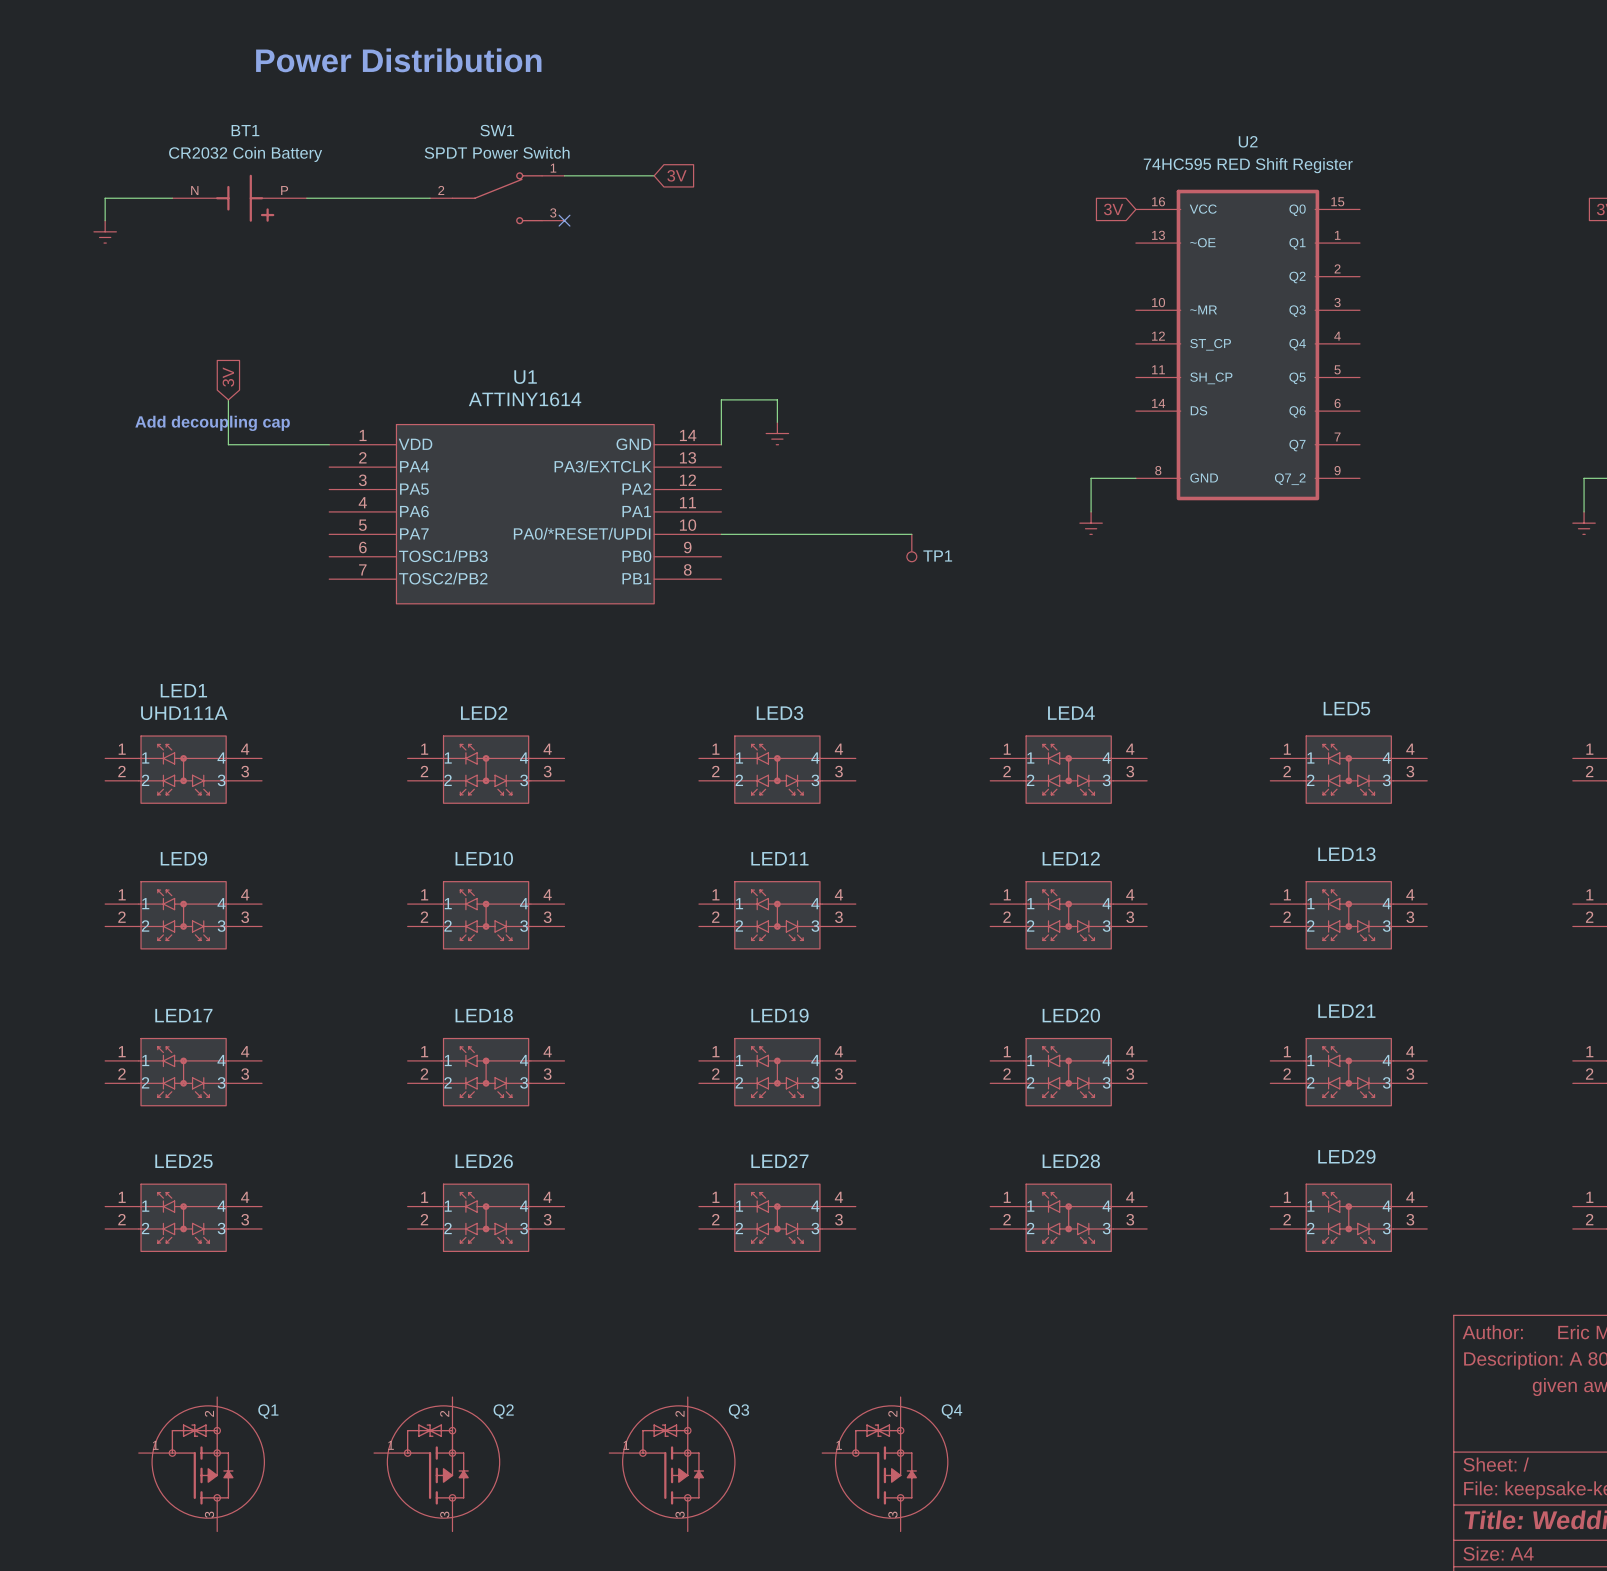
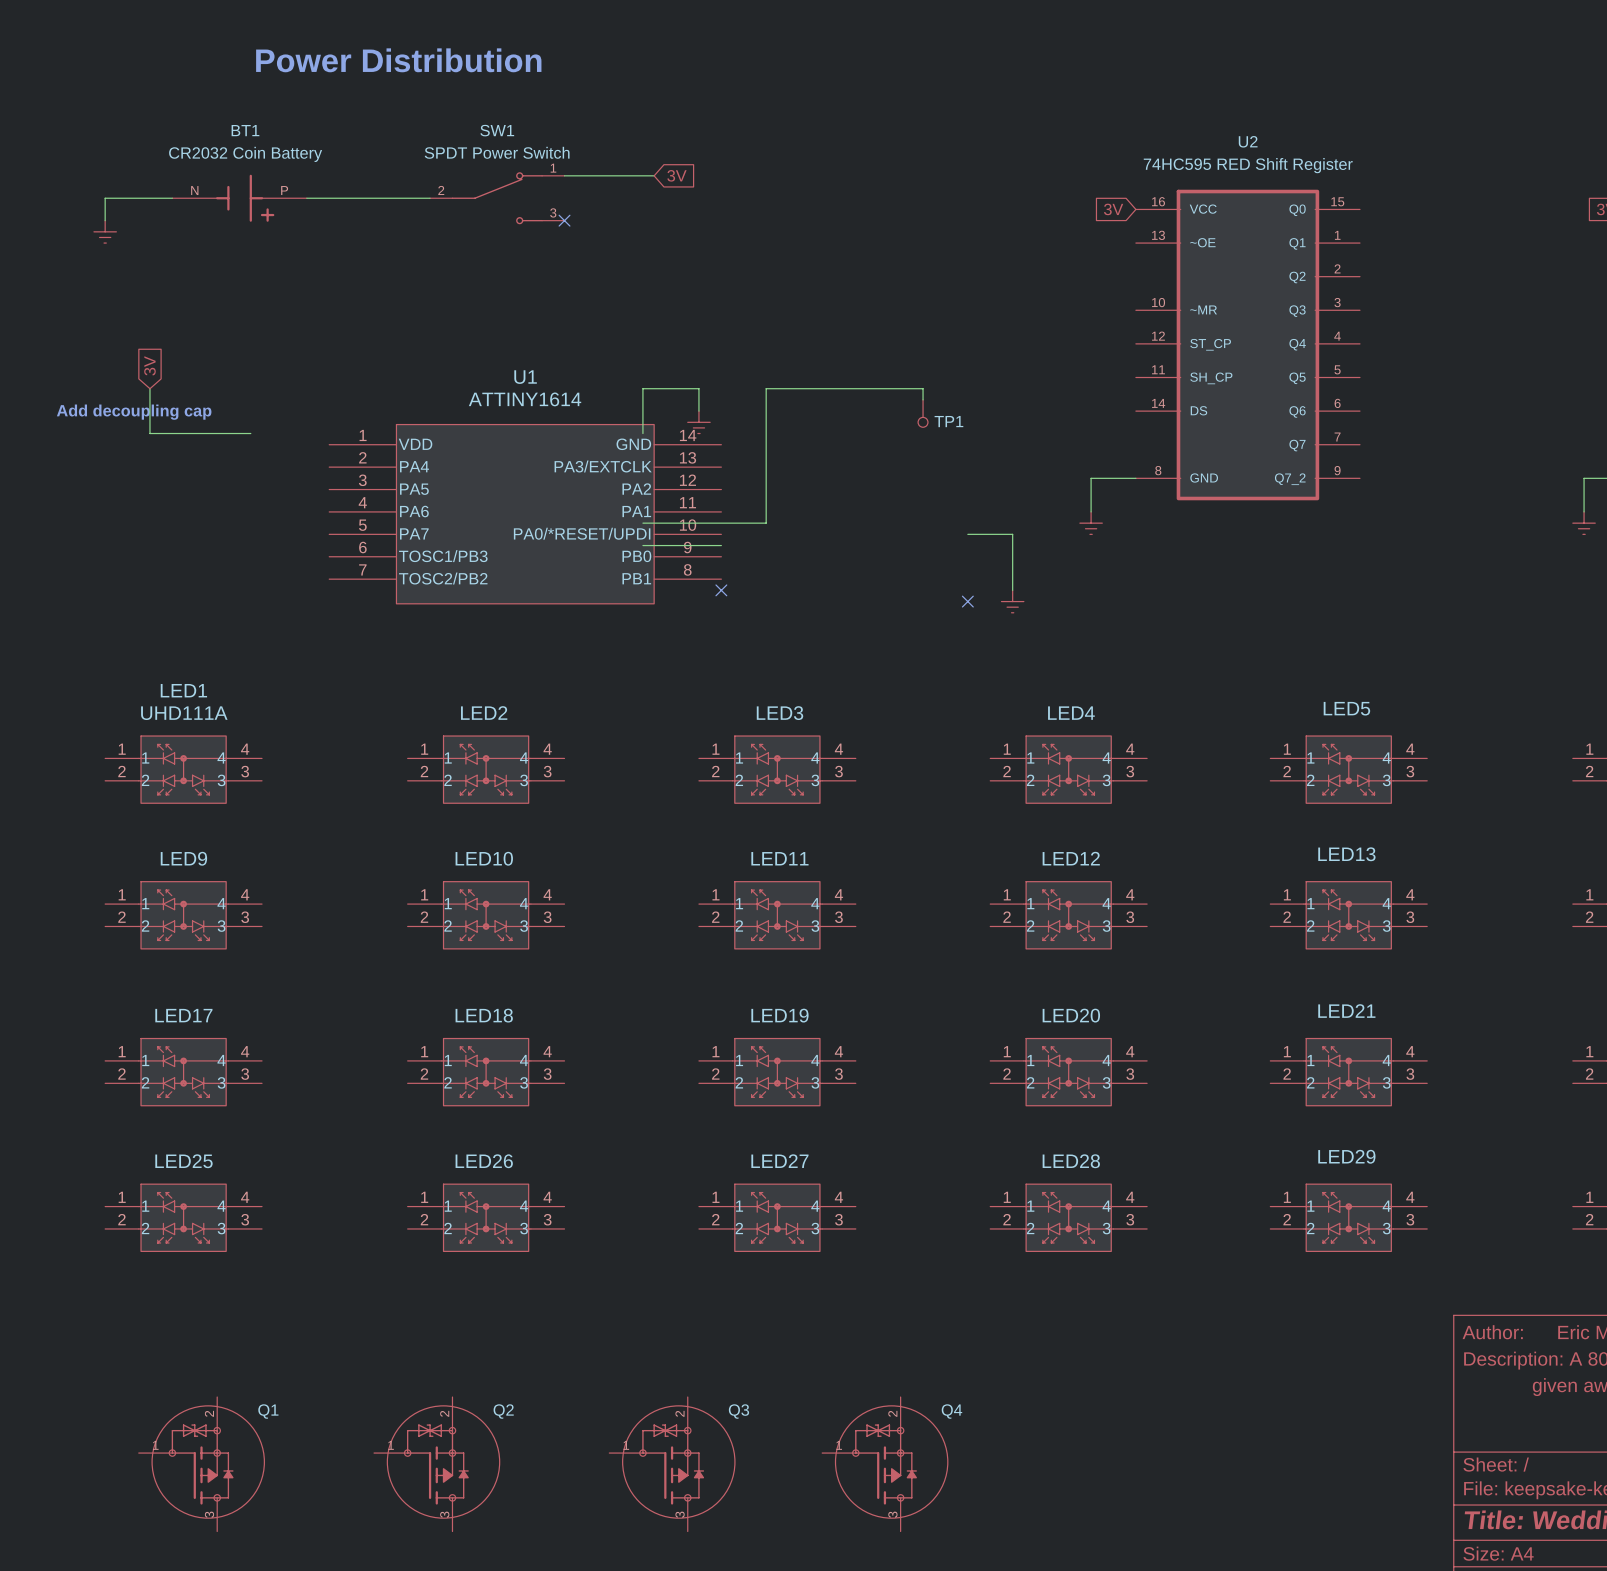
global label position: 3V (228, 377) -> 3V (149, 365)
wire: (228, 399) (228, 444) (329, 444) -> (149, 388) (149, 433) (250, 433)
wire: none -> (923, 399) (923, 388) (766, 388) (766, 523) (642, 523)
wire: (777, 422) (777, 399) (721, 399) (721, 444) -> (698, 411) (698, 388) (642, 388) (642, 433)
text position: Add decoupling cap (212, 423) -> Add decoupling cap (134, 412)
power symbol position: (777, 433) -> (698, 422)
wire: (721, 534) (911, 534) -> none
wire: none -> (967, 534) (1012, 534) (1012, 590)
wire: none -> (642, 545) (721, 545)
TP1 position: (911, 548) -> (923, 413)
no-connect mark: none -> (721, 590)
no-connect mark: none -> (967, 601)
power symbol: none -> (1012, 601)

